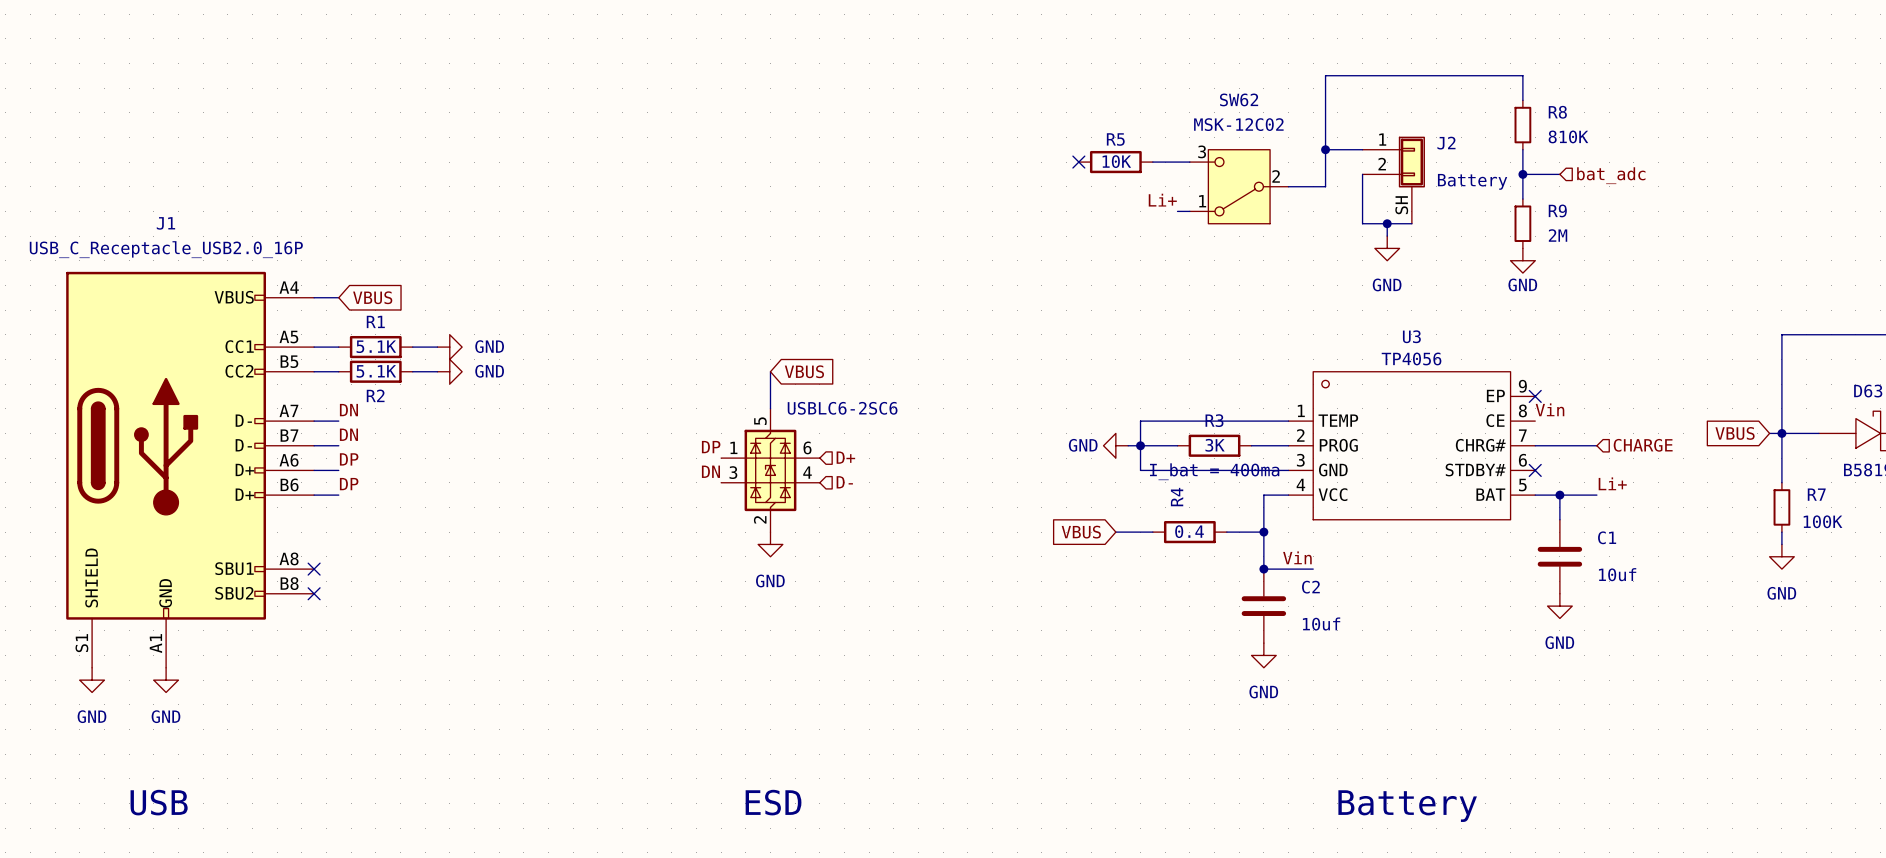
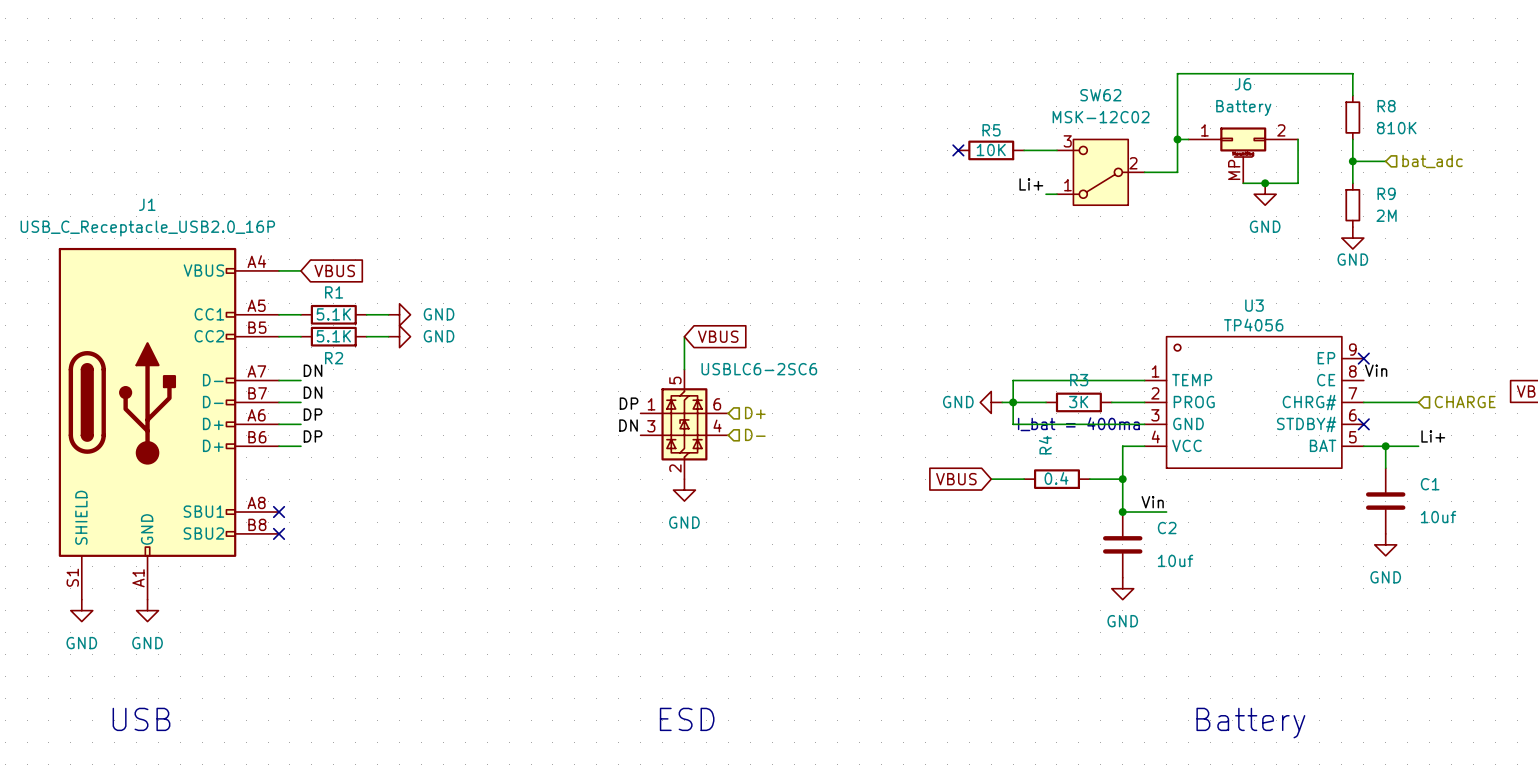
wire: none -> (1298, 139) (1298, 183) (1243, 183)
J6: none -> Battery (1243, 155)
wire: (1362, 174) (1362, 223) (1411, 223) -> none
J2: Battery (1393, 180) -> none
wire: (1387, 223) (1387, 236) -> none
junction position: (1387, 223) -> (1265, 183)
power symbol position: GND (1387, 248) -> GND (1265, 194)

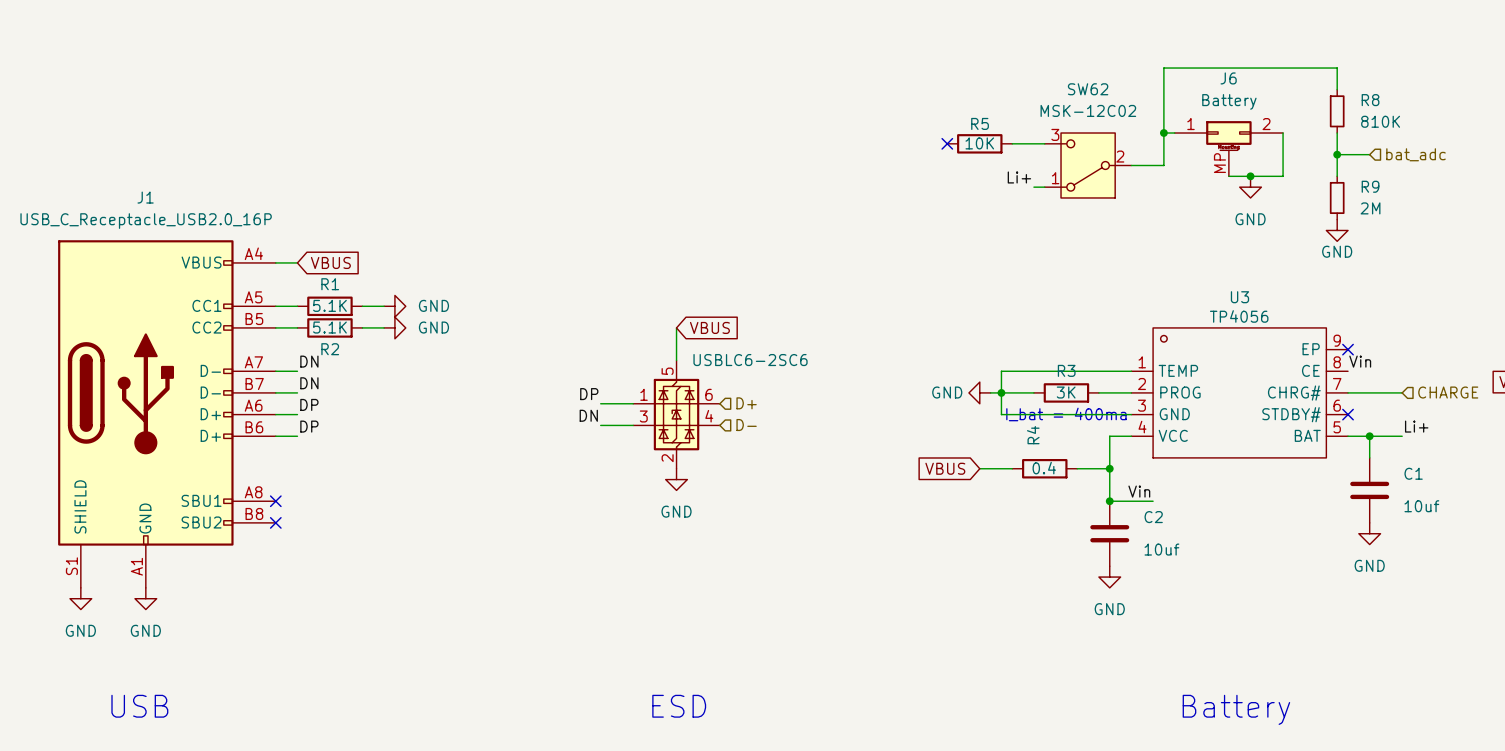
label position: DP (629, 403) -> DP (589, 394)
wire: none -> (600, 403) (633, 403)
label position: DN (628, 425) -> DN (588, 415)
wire: none -> (600, 425) (633, 425)

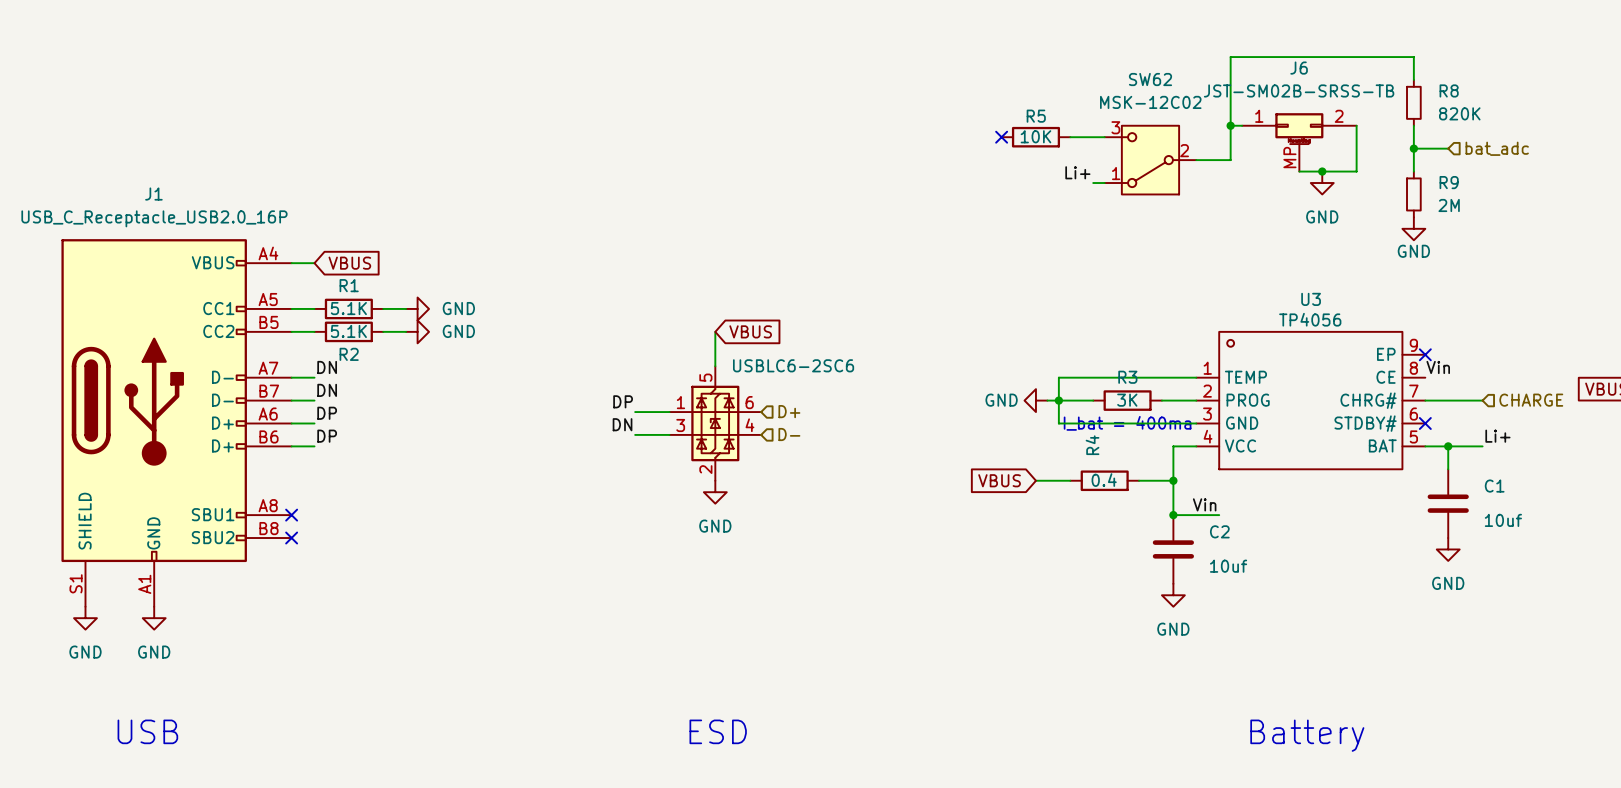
J6 value: Battery (1229, 101) -> JST-SM02B-SRSS-TB (1299, 90)
R8 value: 810K (1380, 121) -> 820K (1459, 113)

